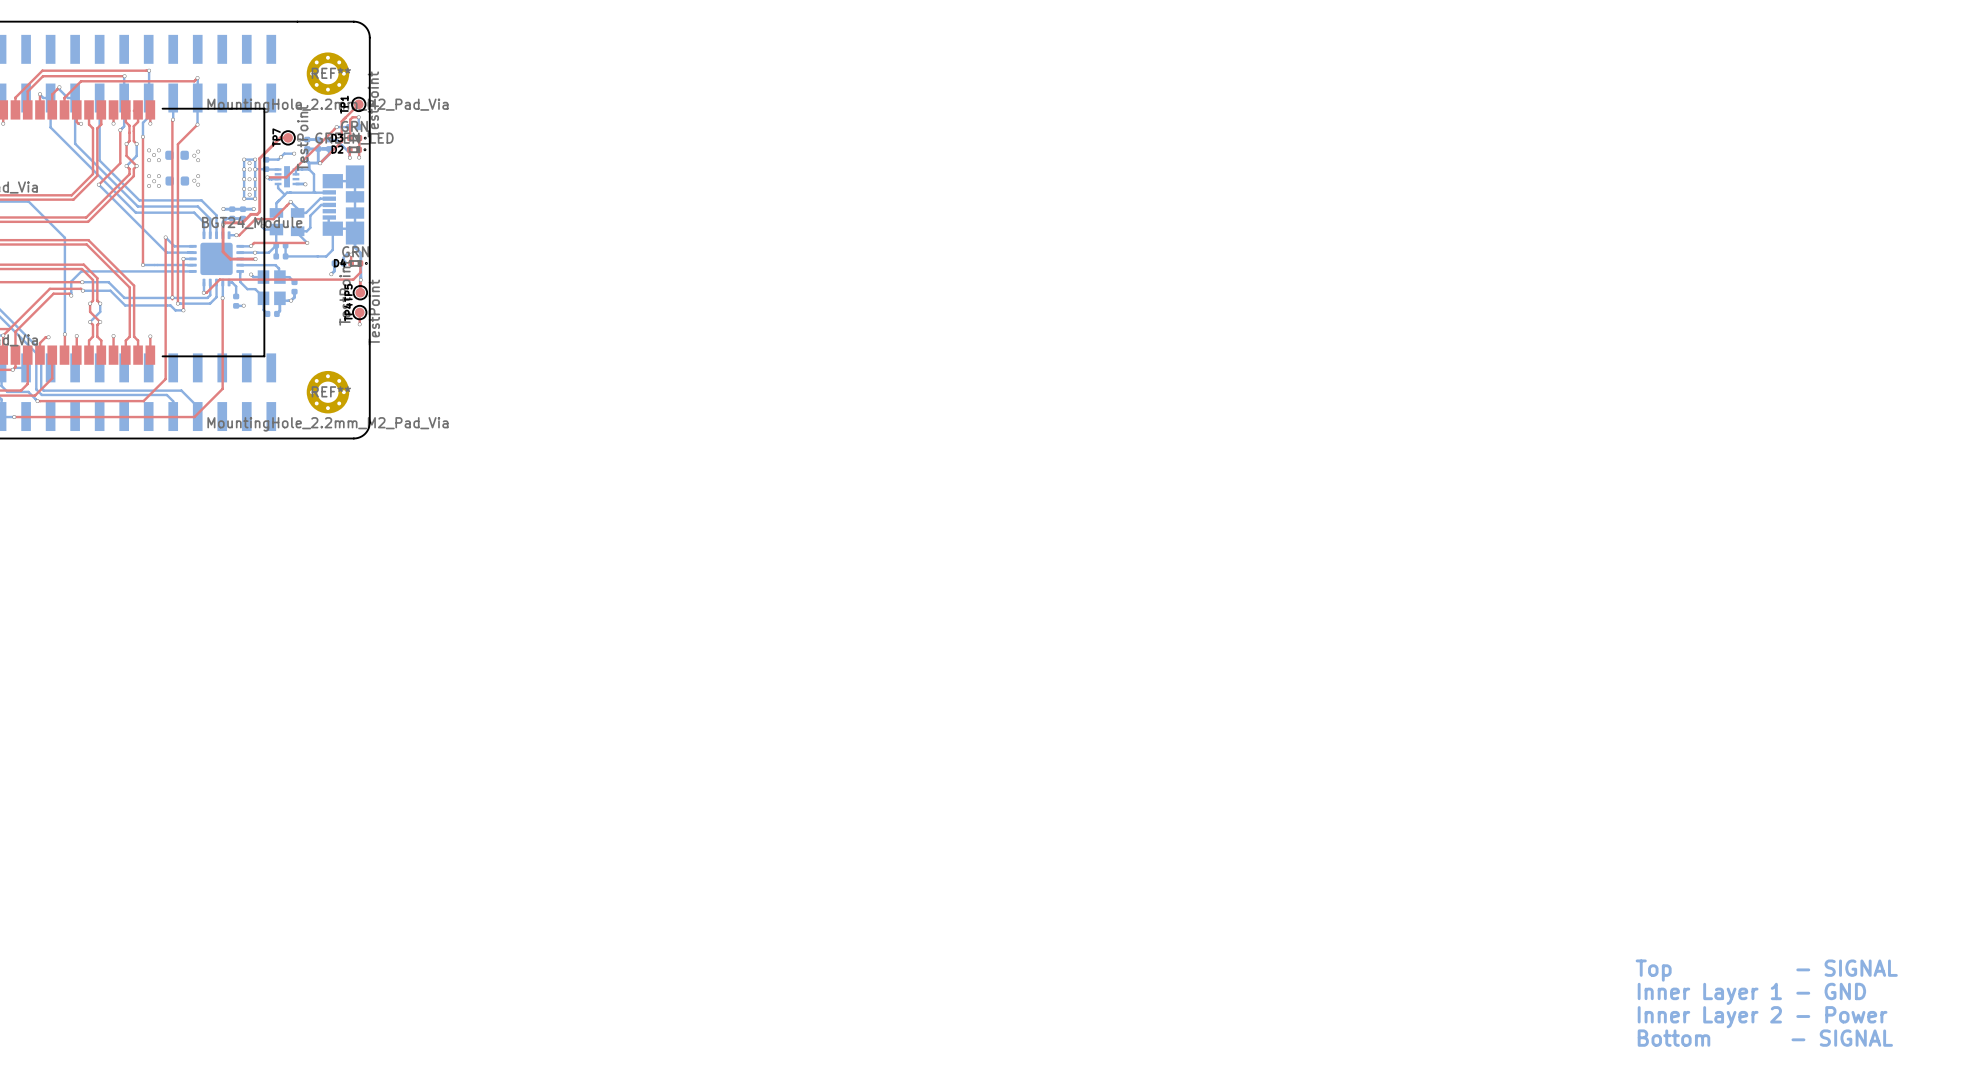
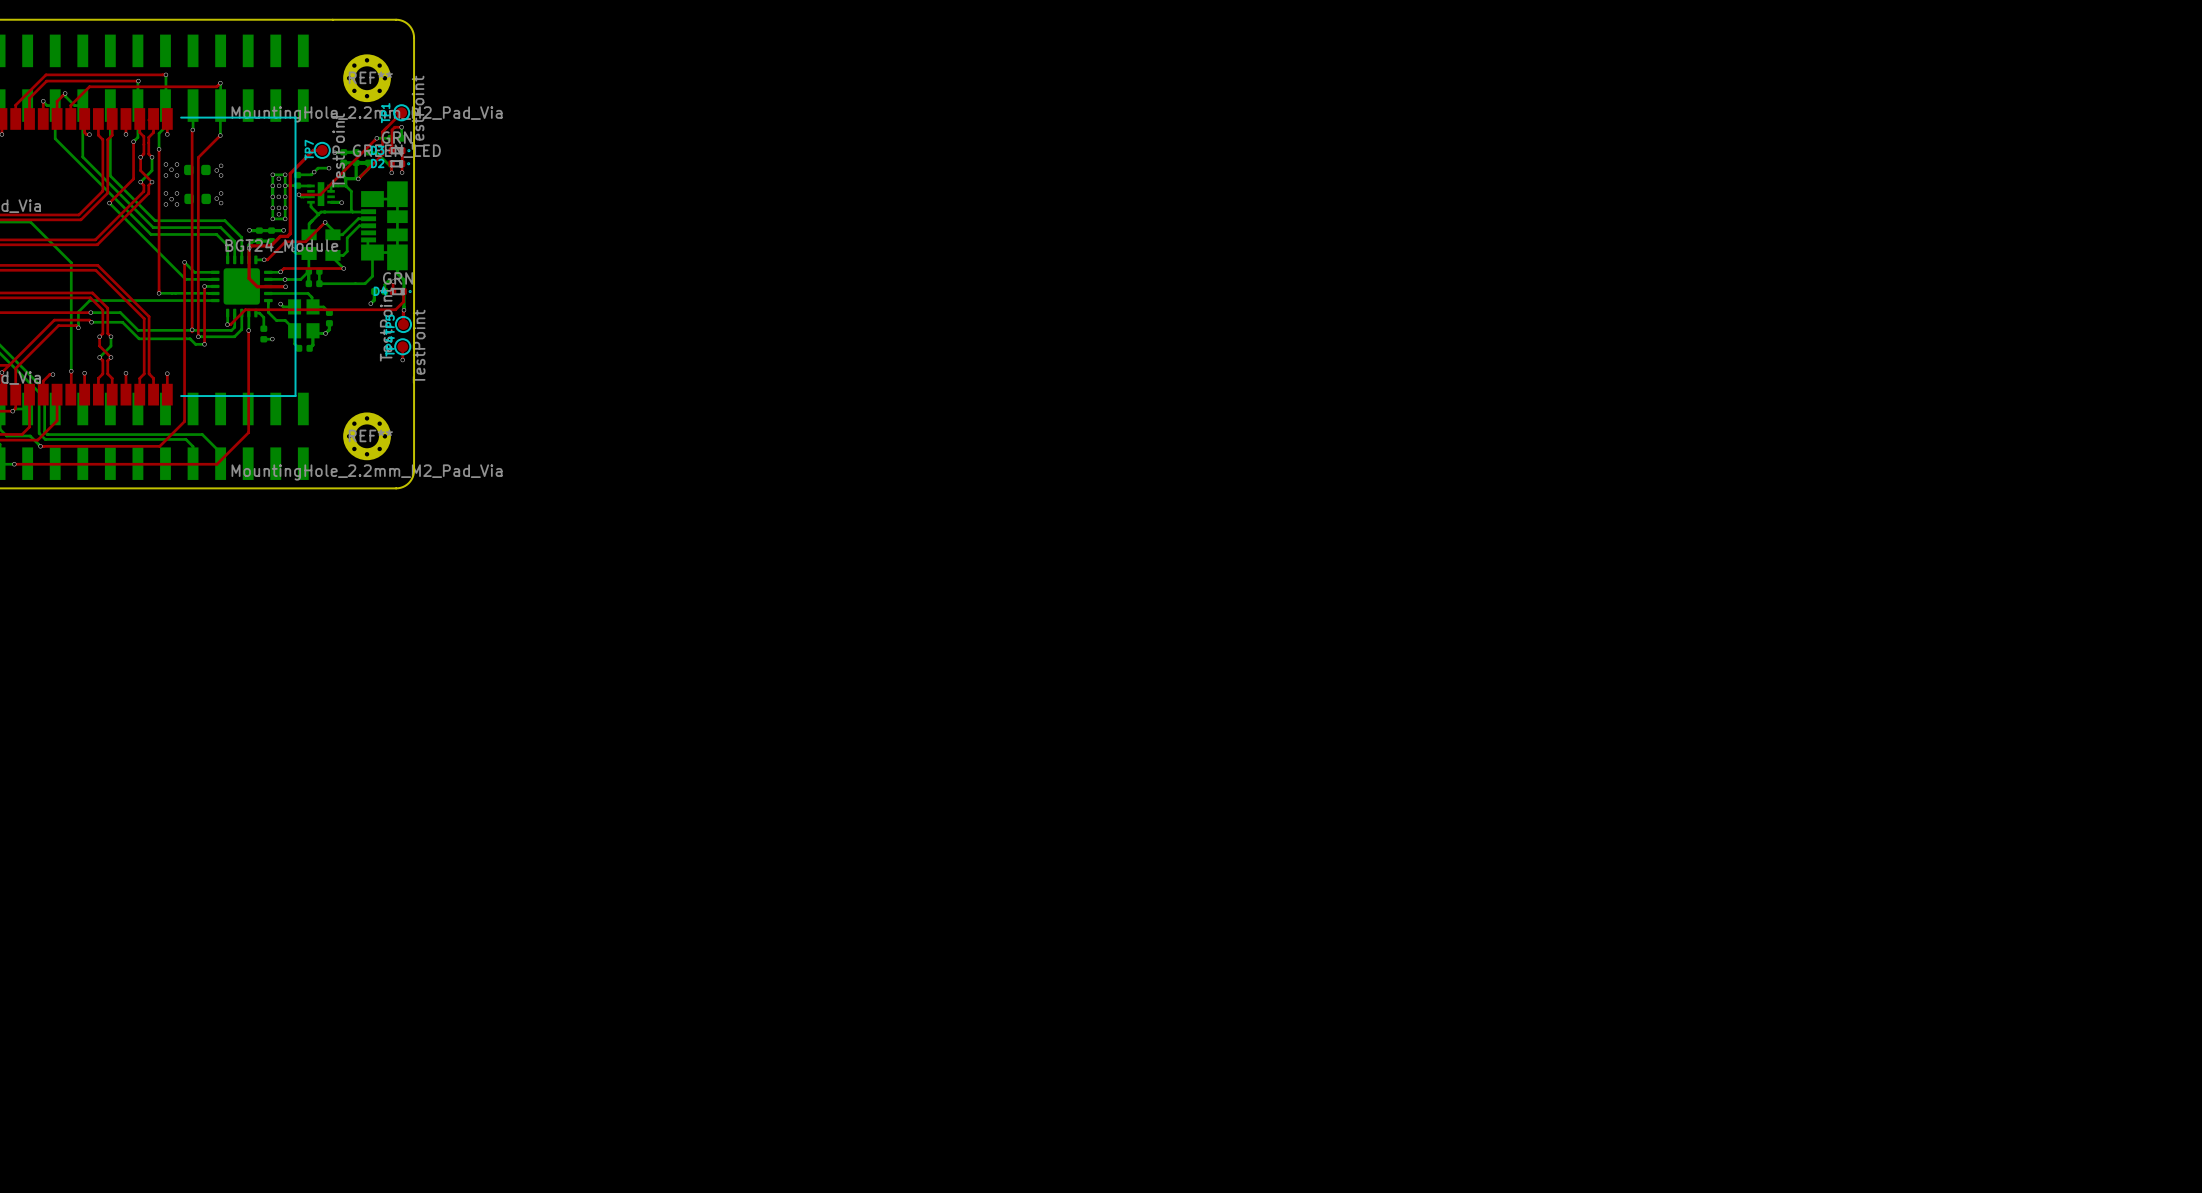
text: Top - SIGNAL (1766, 970) -> none
text: Inner Layer 1 - GND (1751, 993) -> none
text: Inner Layer 2 - Power (1762, 1017) -> none
text: Bottom - SIGNAL (1765, 1038) -> none

